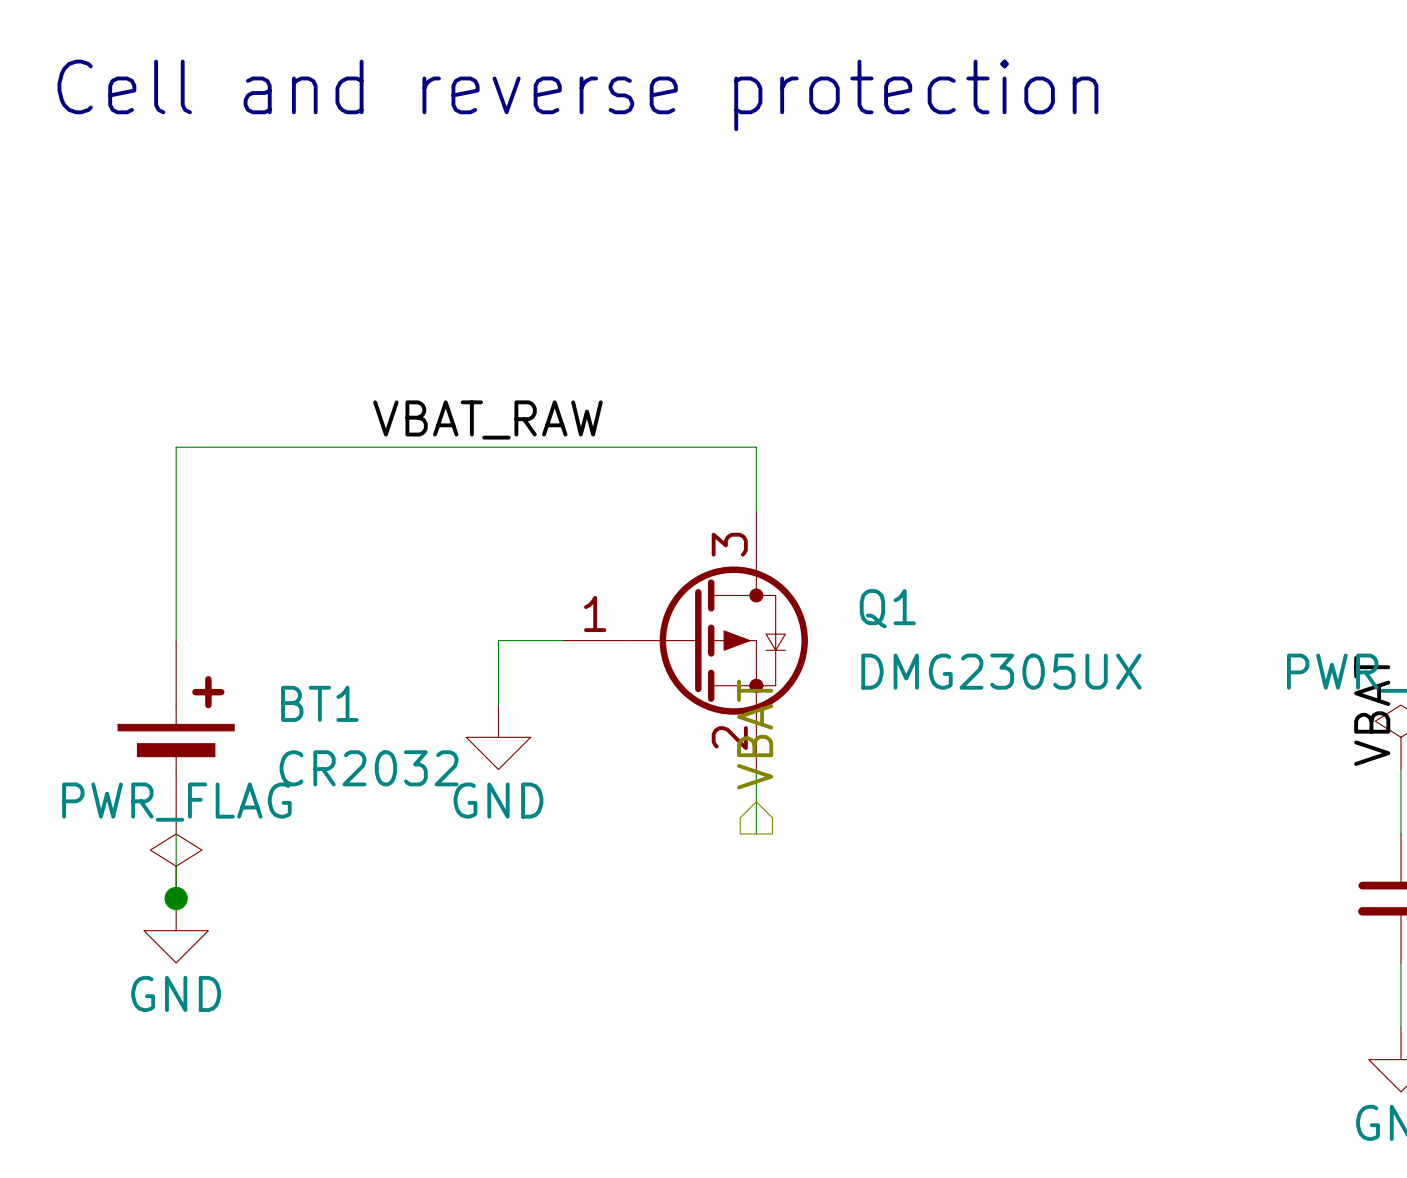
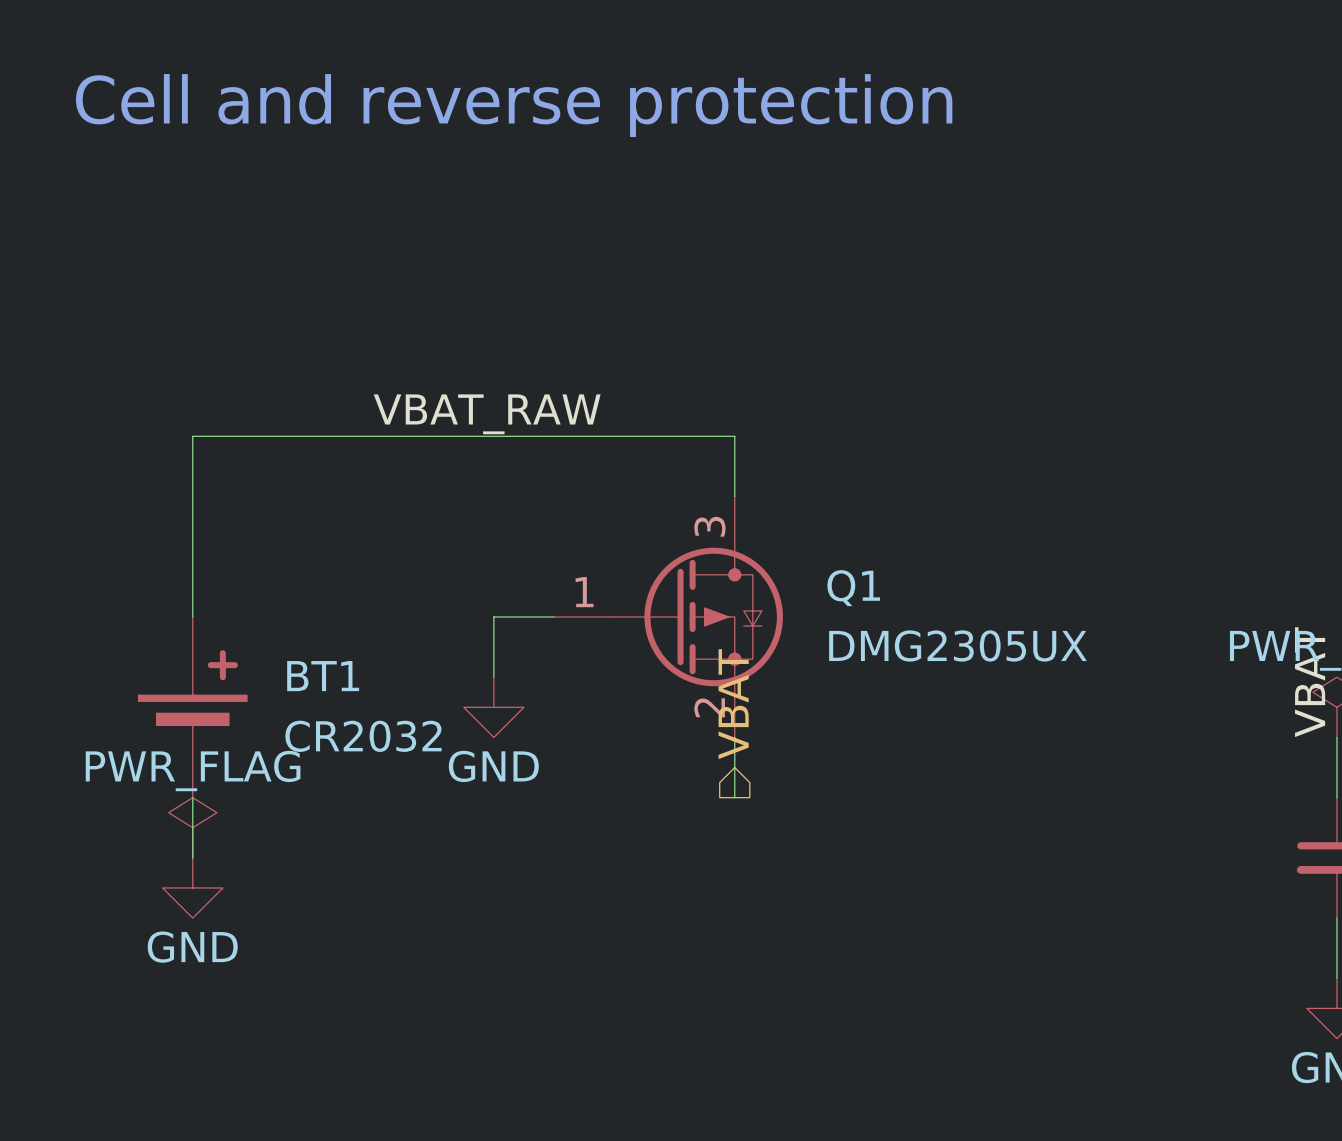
junction: (176, 898) -> none

